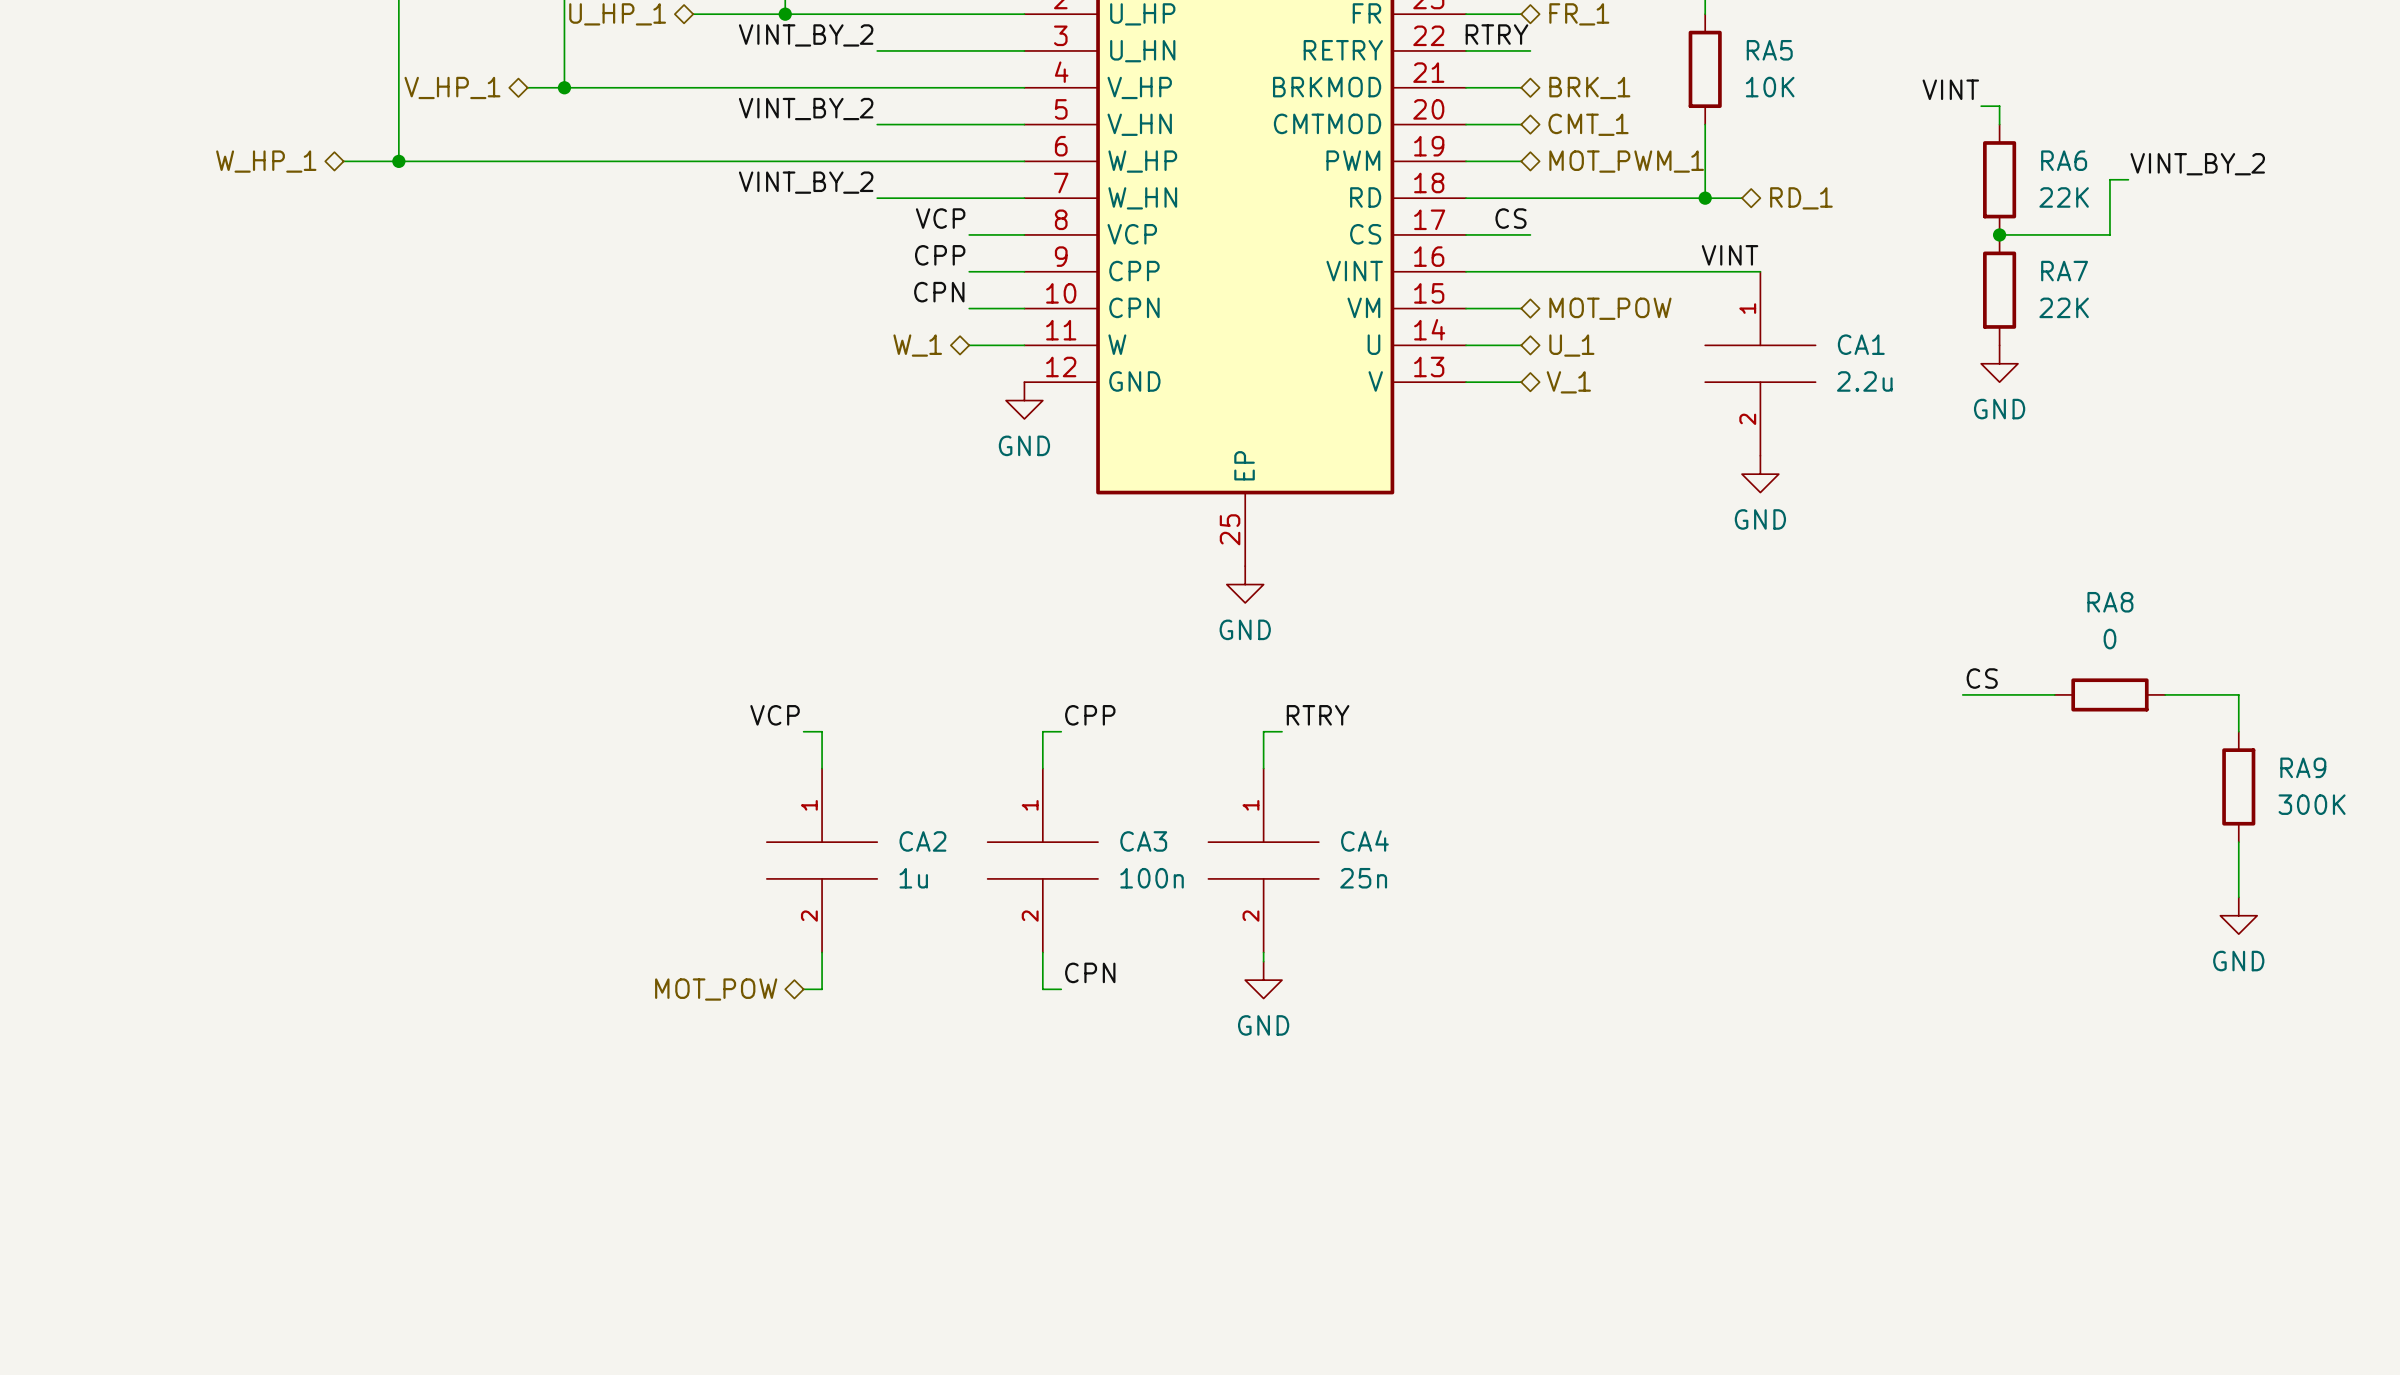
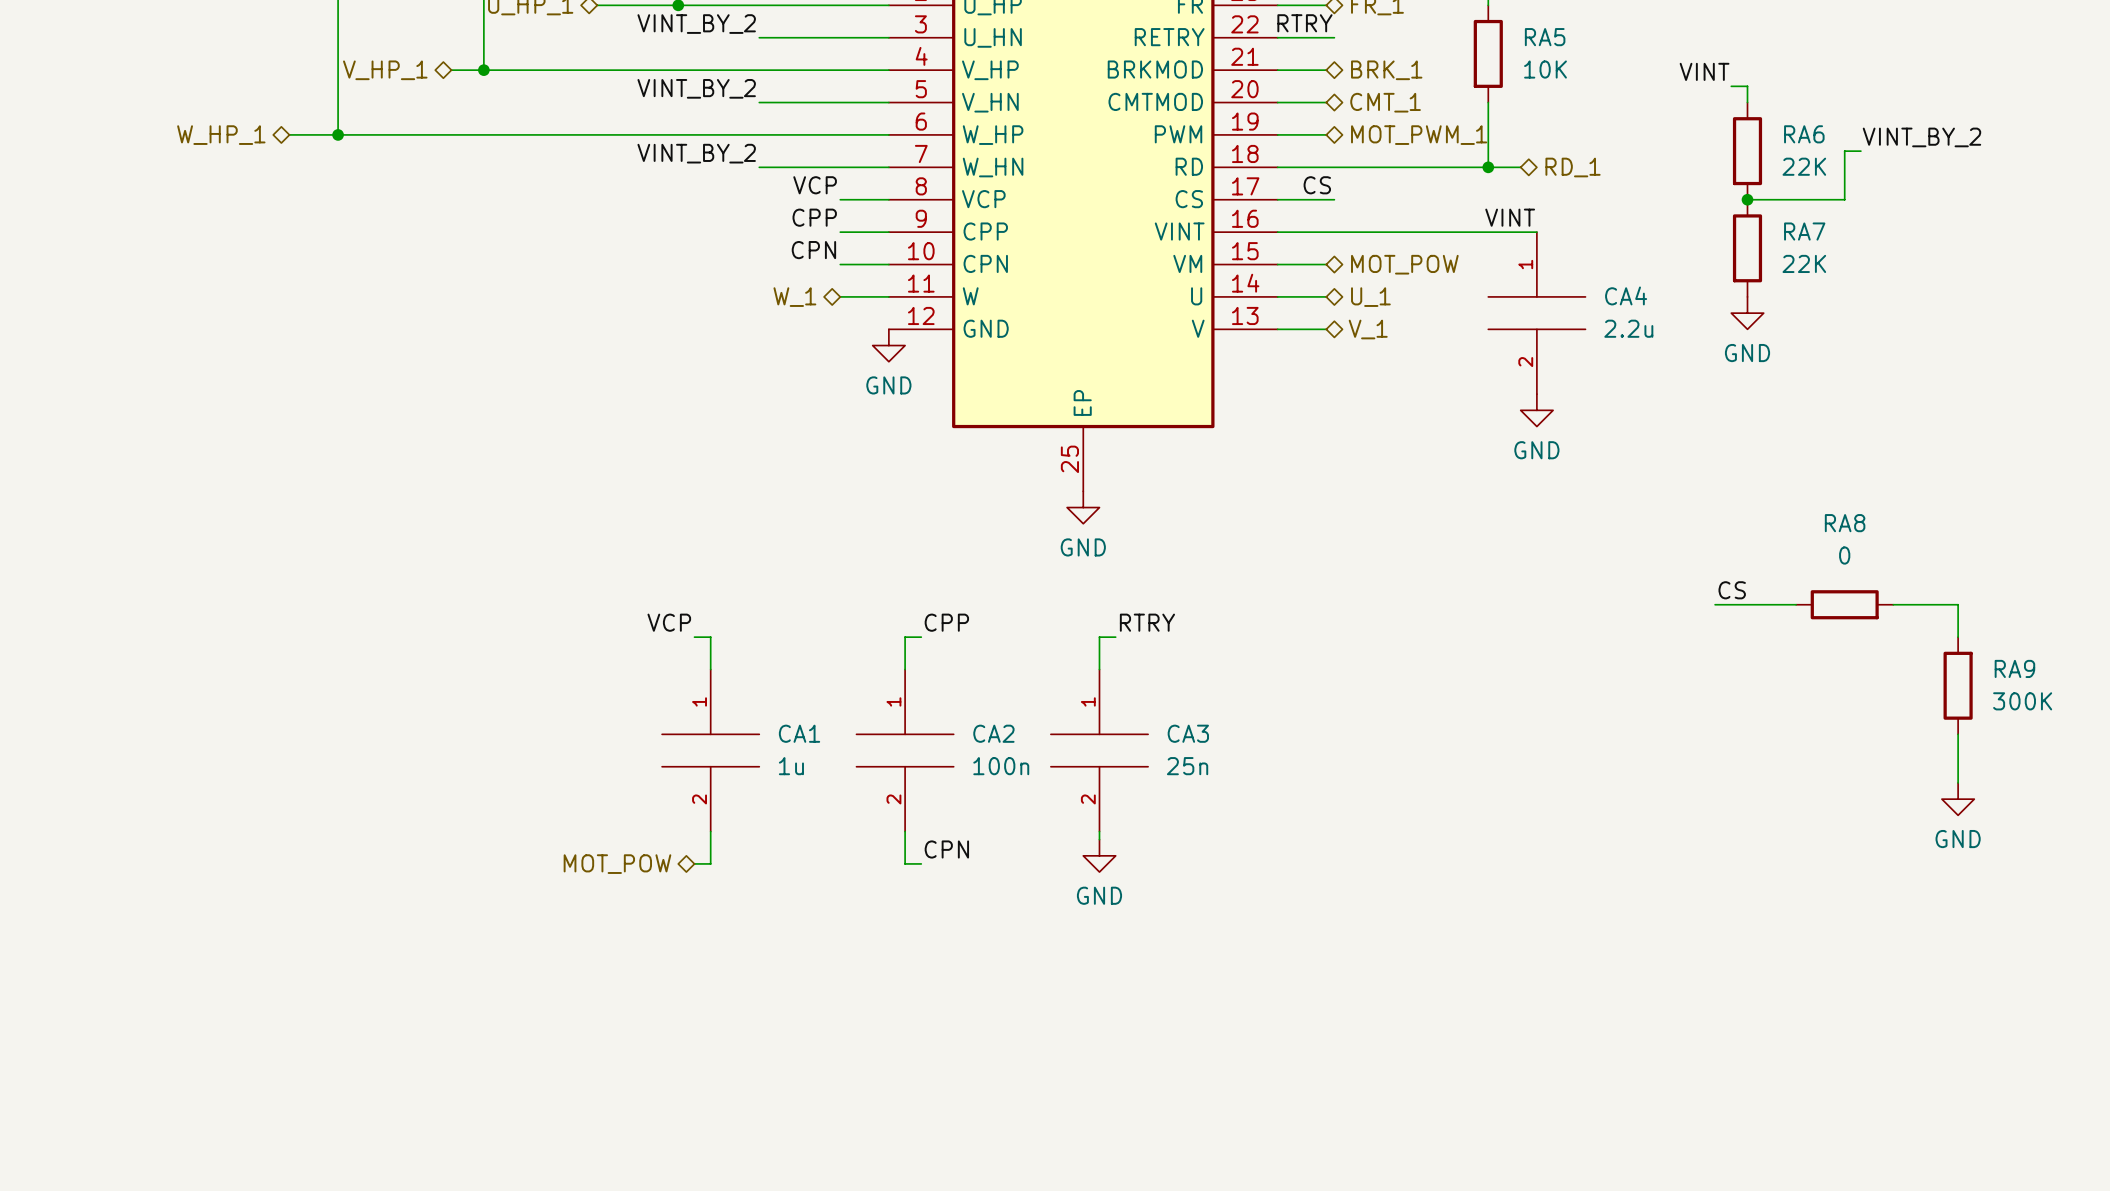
CA1 name: CA1 (1861, 344) -> CA4 (1626, 295)
CA2 name: CA2 (922, 841) -> CA1 (799, 733)
CA3 name: CA3 (1143, 841) -> CA2 (993, 733)
CA4 name: CA4 (1364, 841) -> CA3 (1188, 733)

